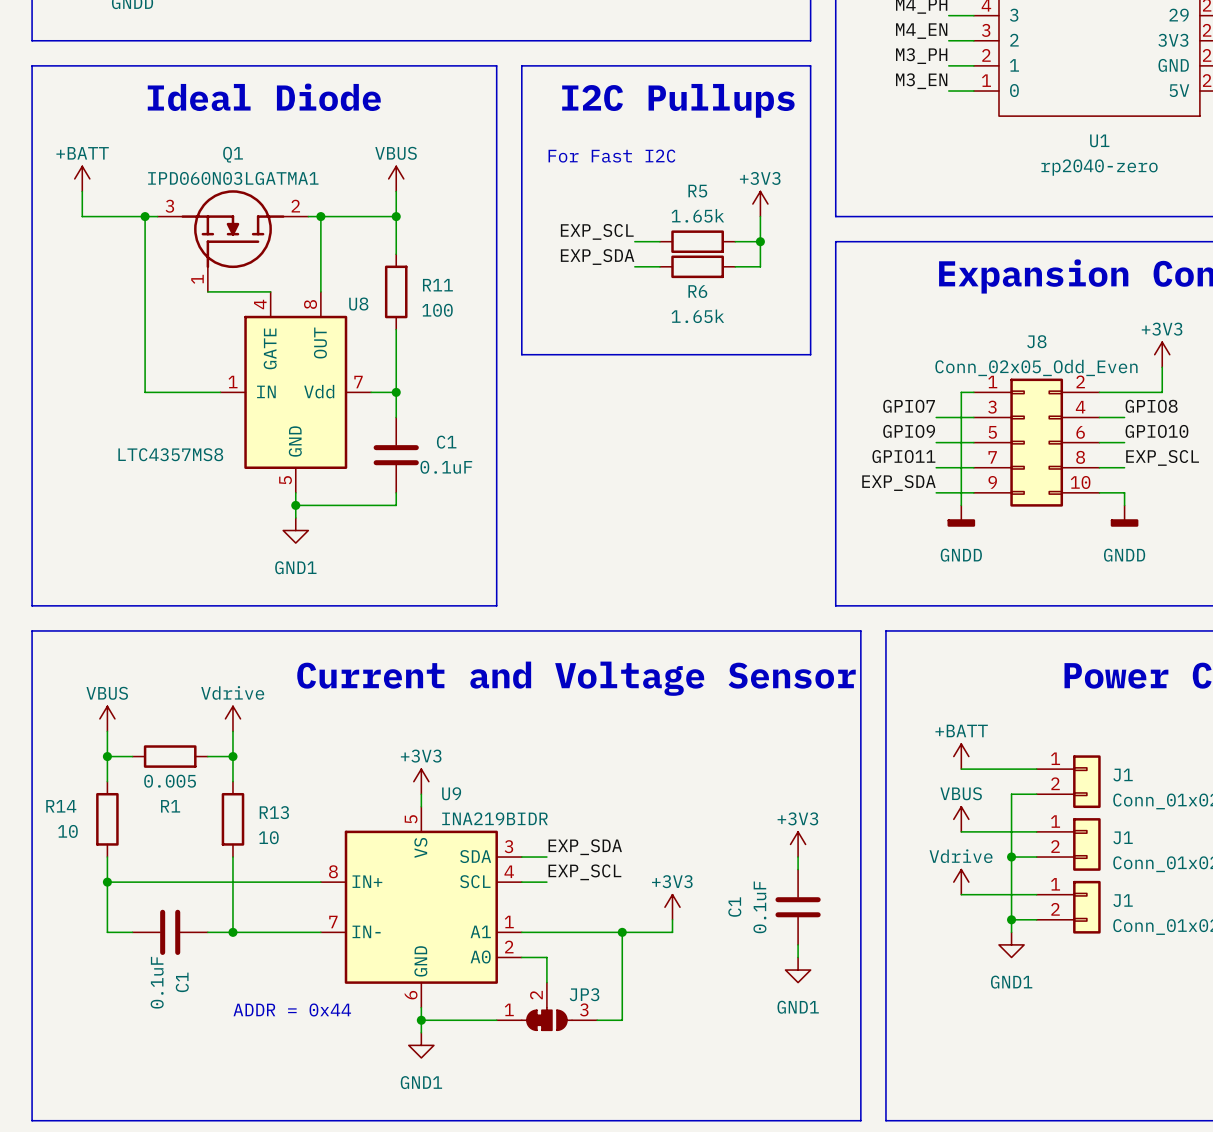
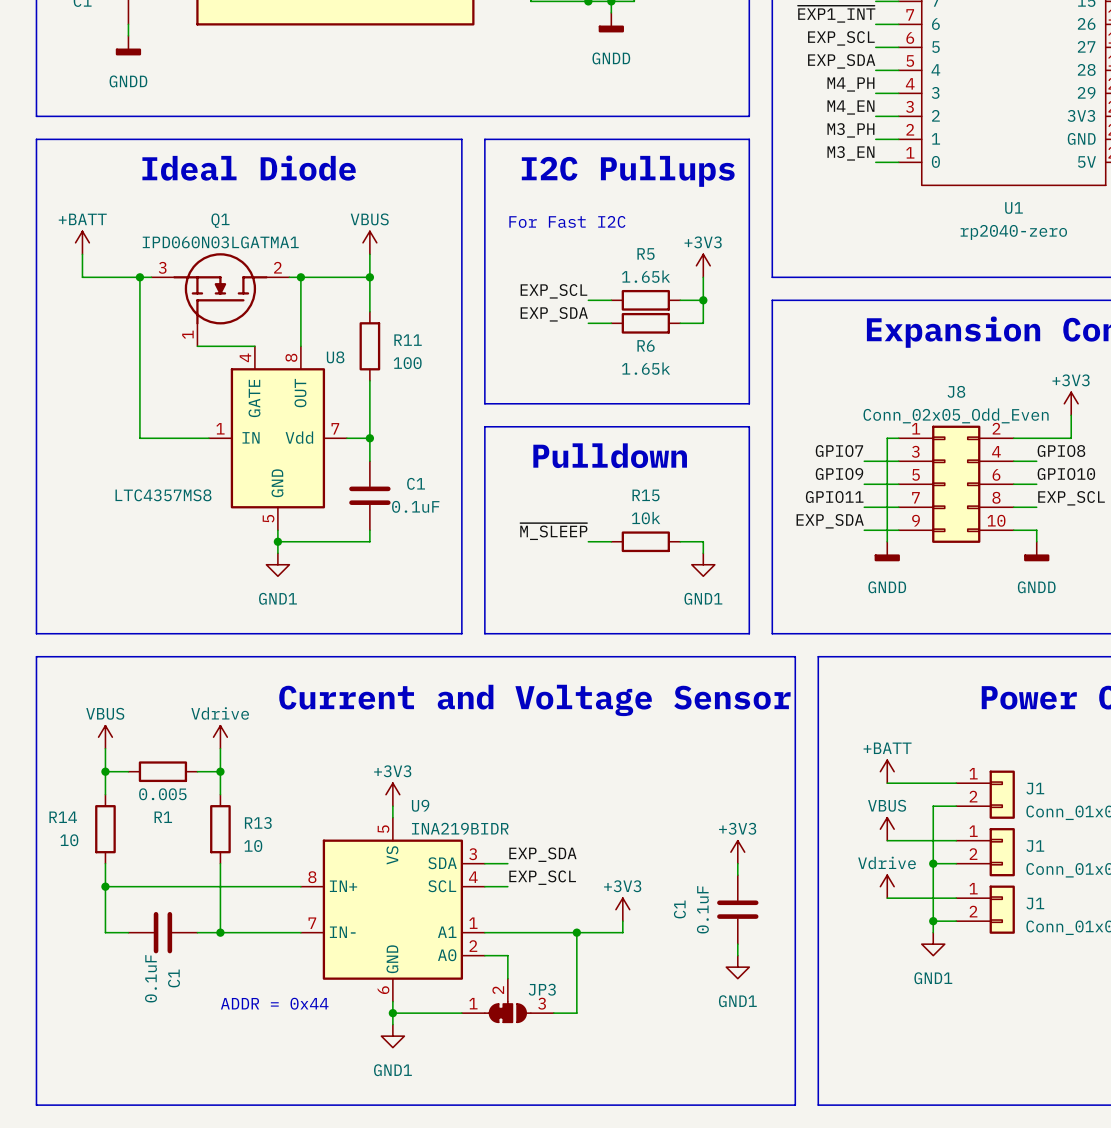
line: none -> (484, 426) (749, 426) (749, 633) (484, 633) (484, 426)
text: none -> Pulldown (610, 455)
label: none -> ~{M_SLEEP} (553, 531)
wire: none -> (588, 541) (611, 541)
R15: none -> 10k (645, 541)
wire: none -> (680, 541) (703, 541) (703, 553)
power symbol: none -> GND1 (703, 564)

